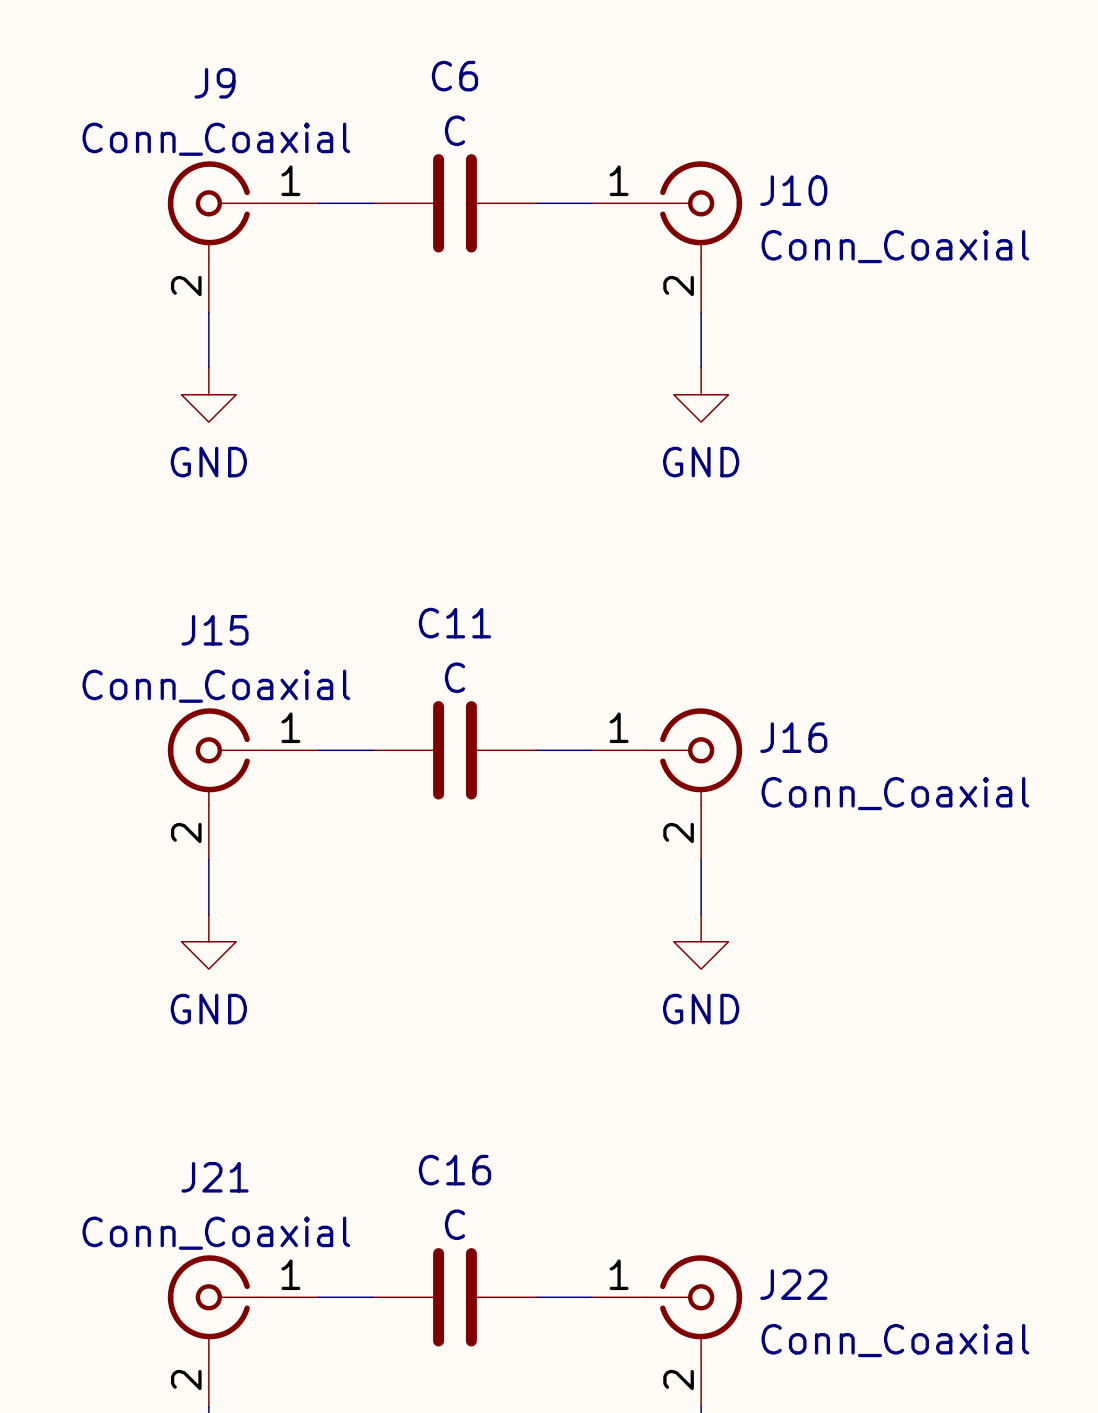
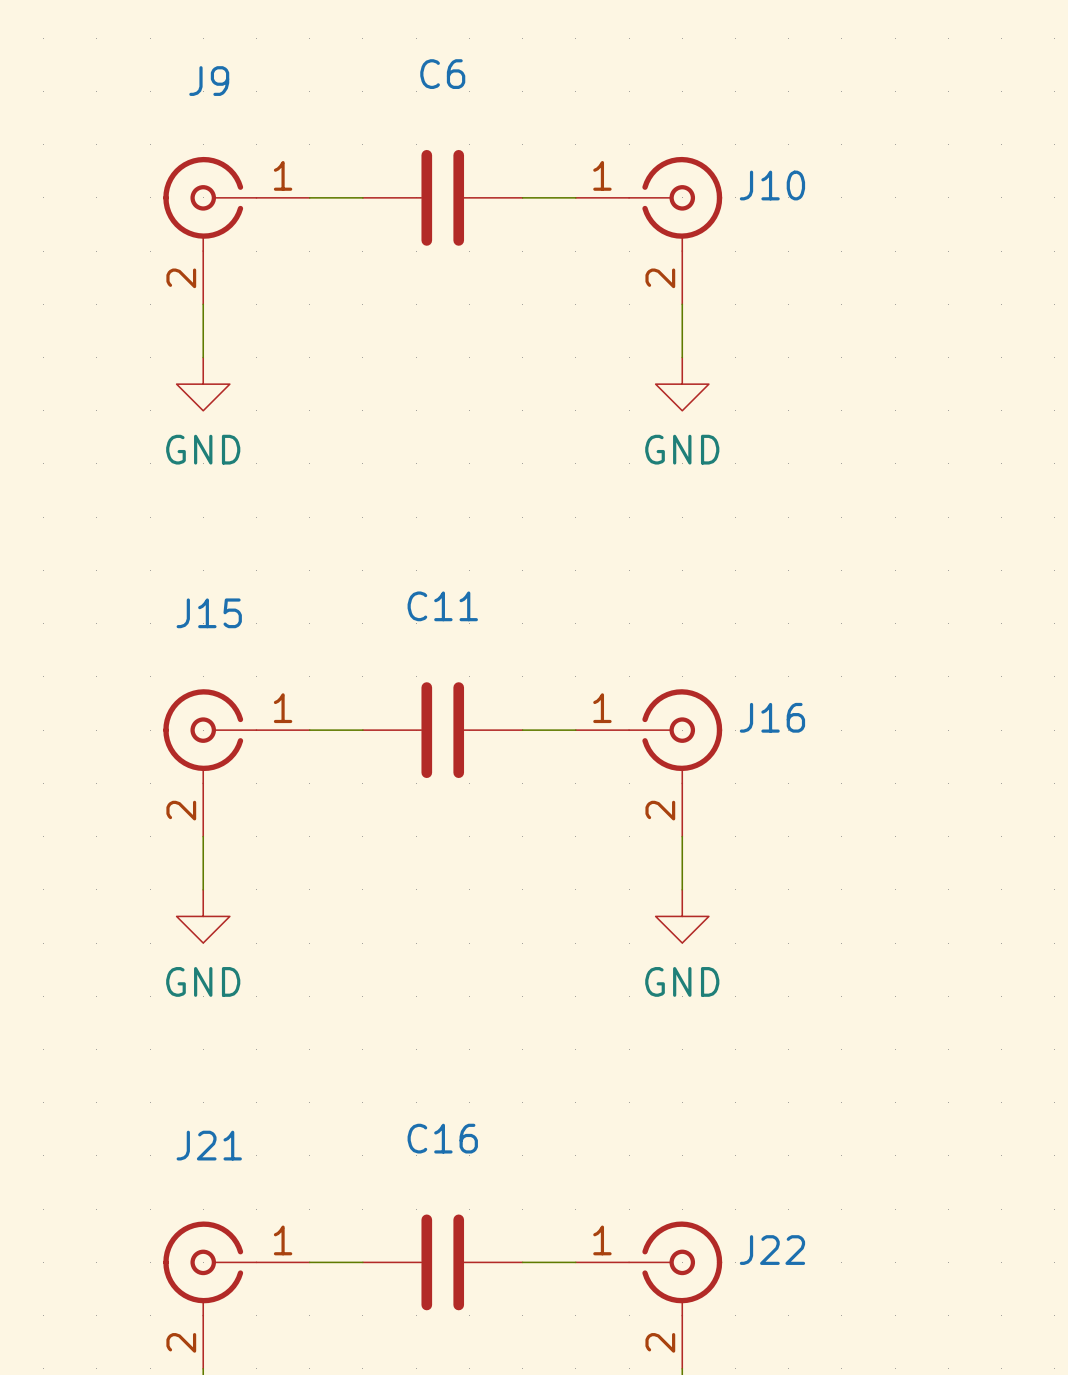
C6 value: C (454, 130) -> none
J9 value: Conn_Coaxial (216, 139) -> none
J10 value: Conn_Coaxial (895, 246) -> none
C11 value: C (454, 677) -> none
J15 value: Conn_Coaxial (216, 686) -> none
J16 value: Conn_Coaxial (895, 793) -> none
C16 value: C (454, 1224) -> none
J21 value: Conn_Coaxial (216, 1233) -> none
J22 value: Conn_Coaxial (895, 1340) -> none

